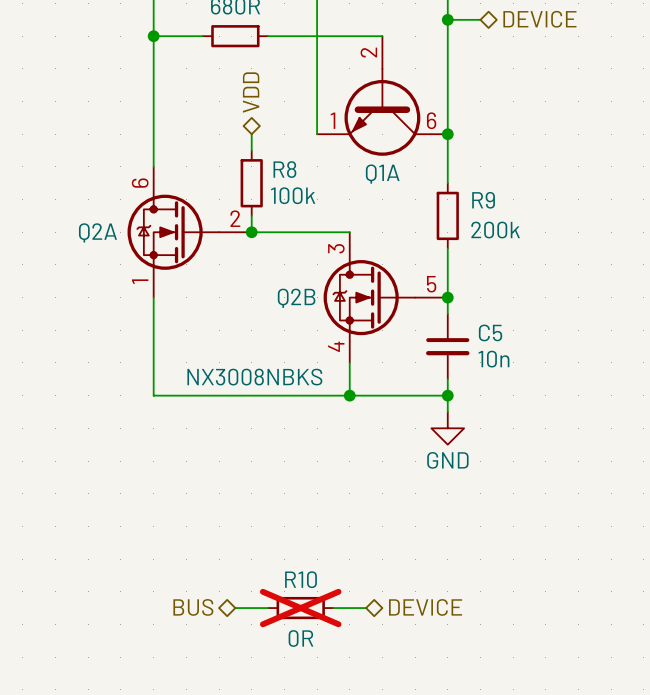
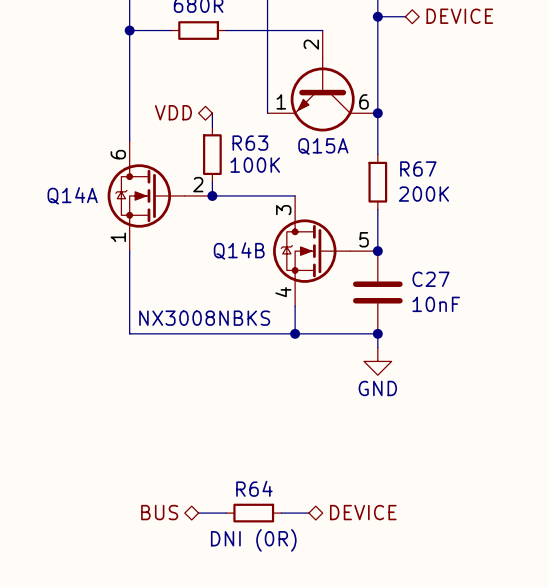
hierarchical label rotation: 0° (251, 92) -> 90° counterclockwise (173, 112)
hierarchical label position: VDD (251, 92) -> VDD (173, 112)
Q1A: (382, 95) -> none
Q15A: none -> (322, 80)
R8 name: R8 (284, 169) -> R63 (250, 143)
R8 value: 100k (293, 195) -> 100K (255, 165)
R9 name: R9 (483, 200) -> R67 (418, 168)
R9 value: 200k (495, 230) -> 200K (423, 194)
Q2A name: Q2A (97, 232) -> Q14A (72, 195)
Q2B name: Q2B (296, 298) -> Q14B (239, 250)
C5: 10n (447, 346) -> none
C27: none -> 10nF (377, 292)
R10 name: R10 (300, 579) -> R64 (254, 488)
R10 do-not-place cross: (300, 608) -> none
R10 value: 0R (300, 638) -> DNI (0R) (253, 540)

